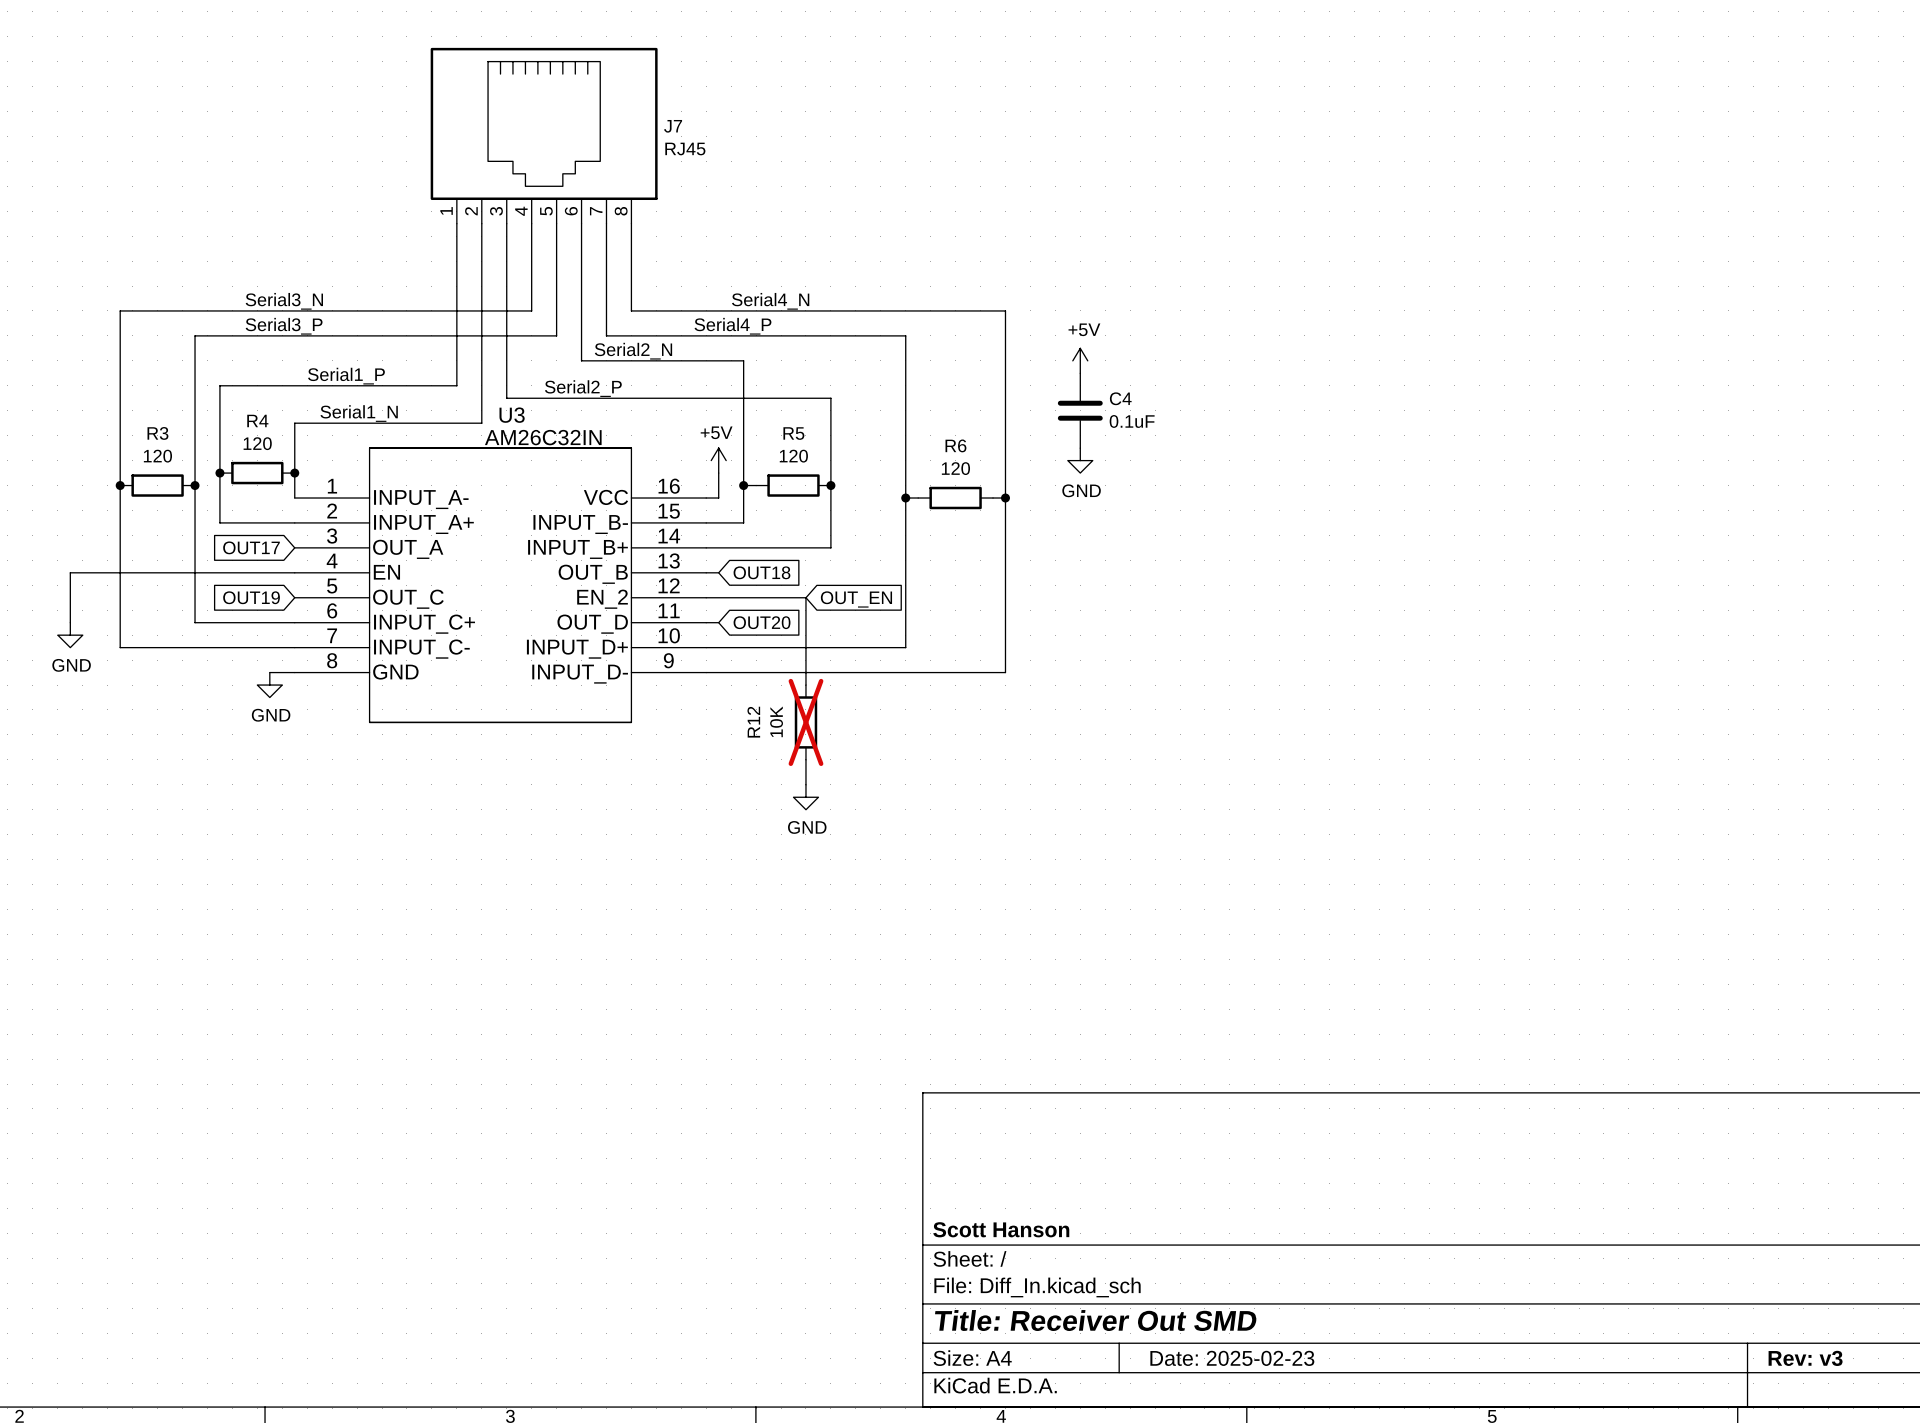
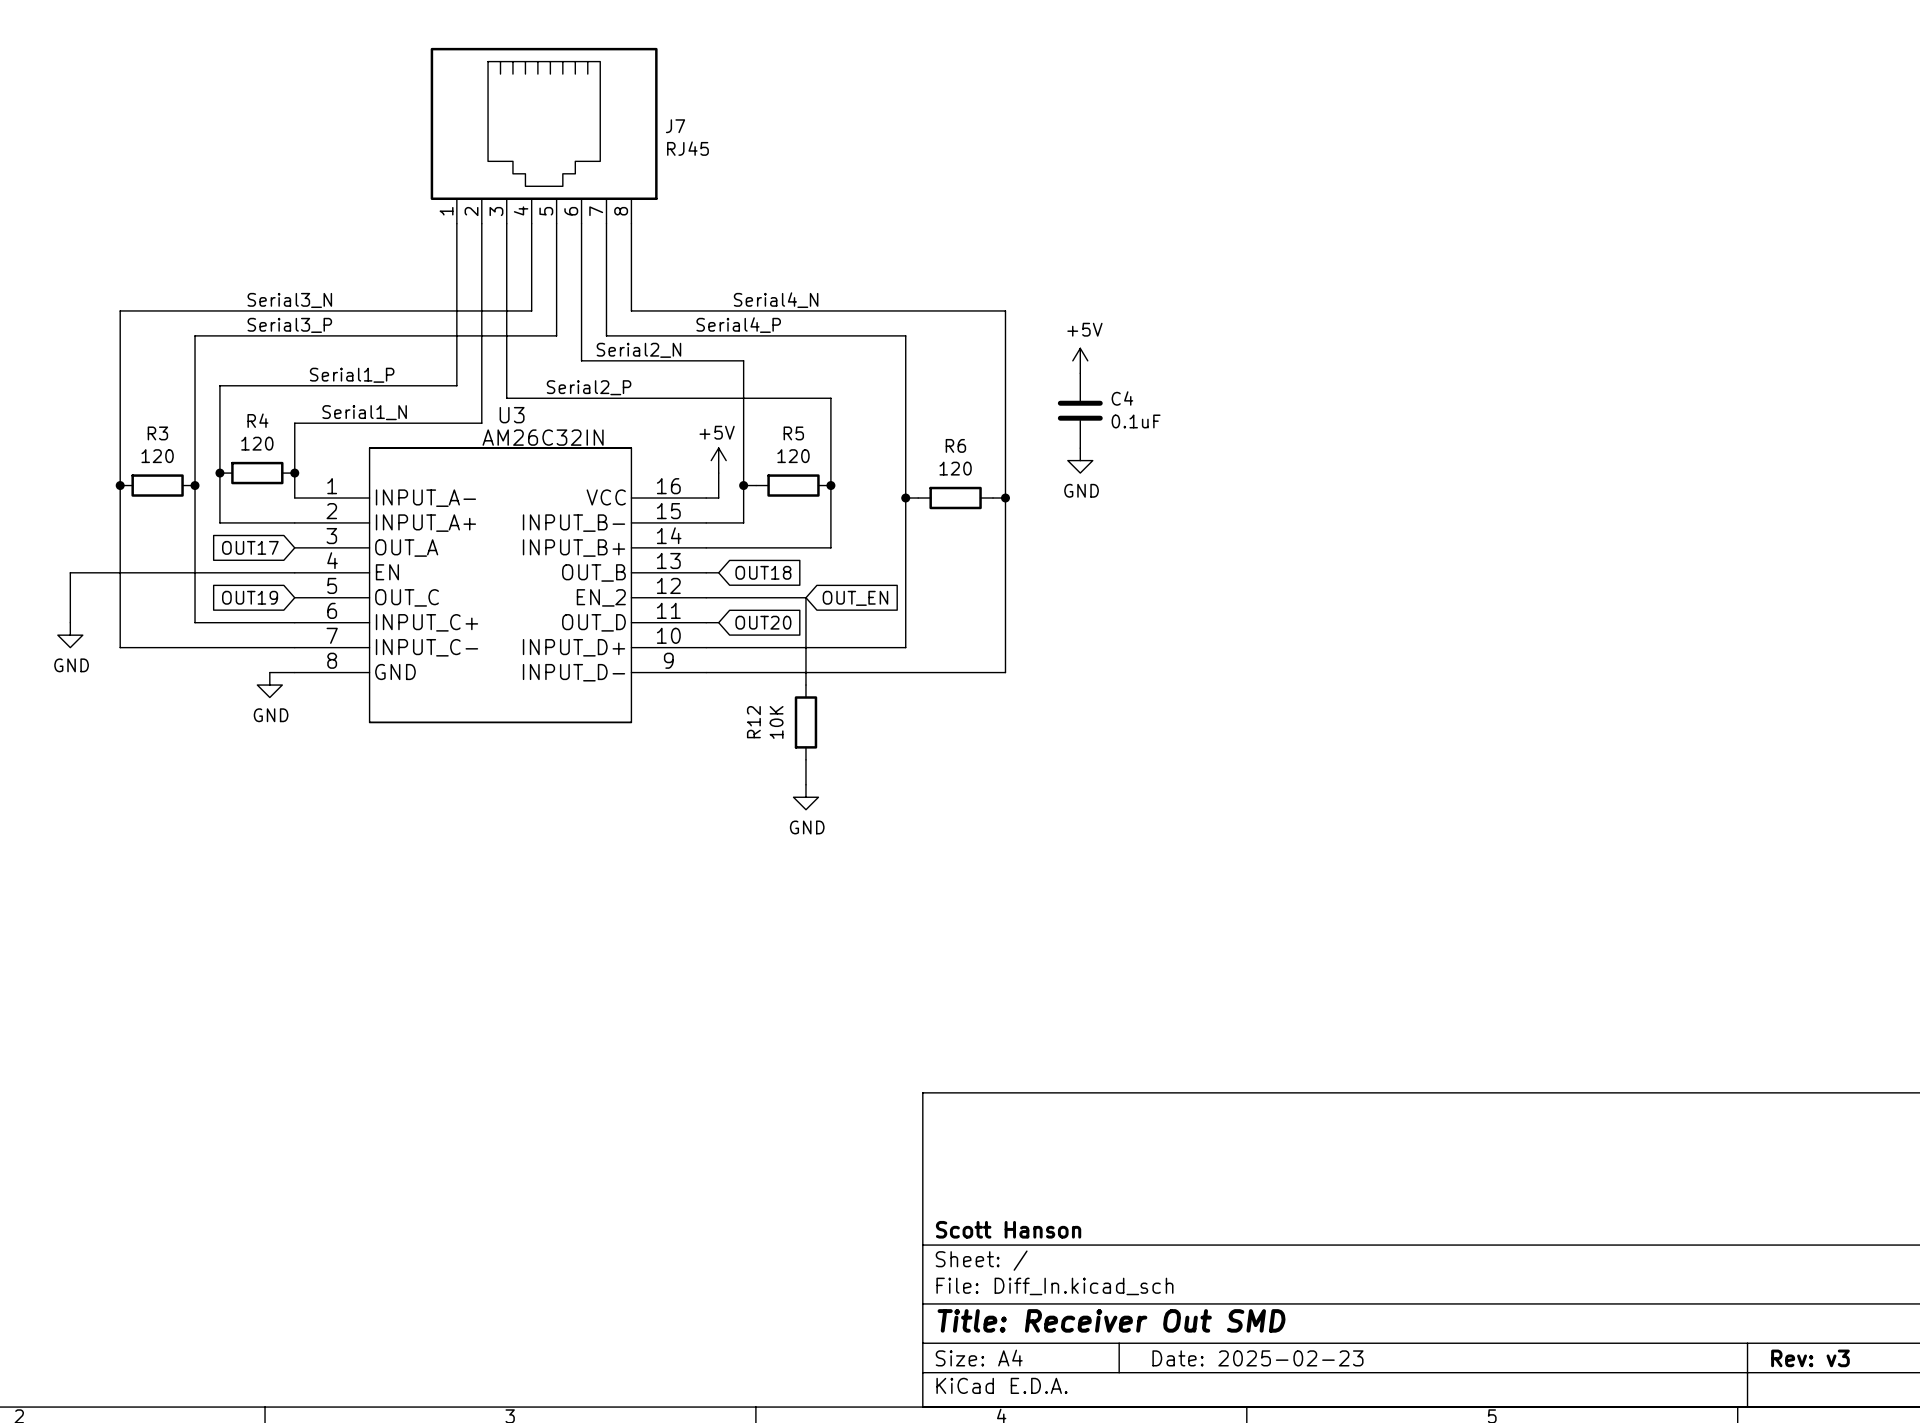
R12 do-not-place cross: (805, 722) -> none

